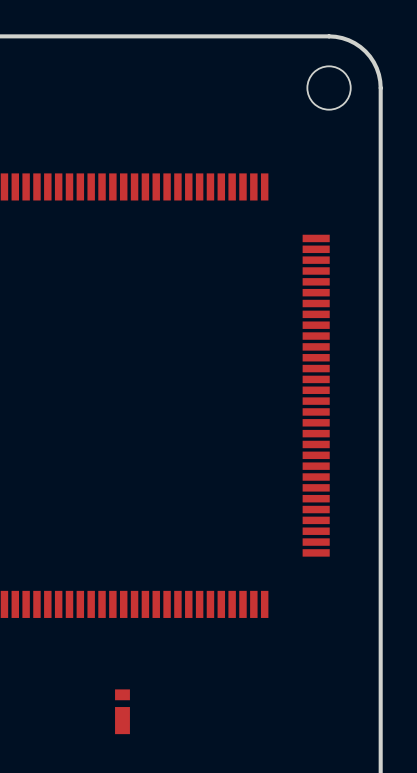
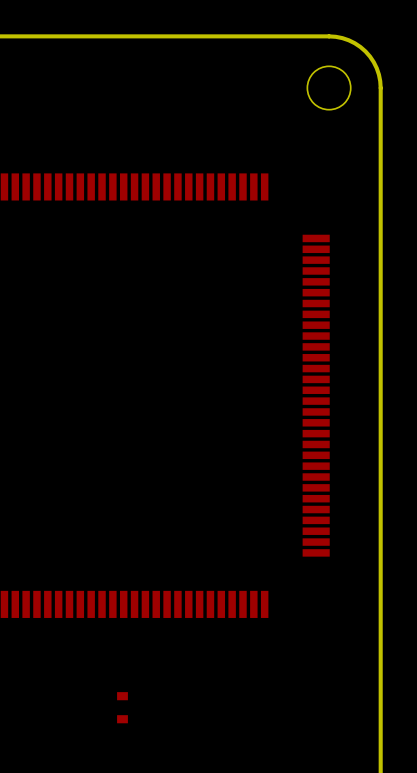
part footprint: [115, 689, 130, 735] -> [117, 692, 128, 724]

